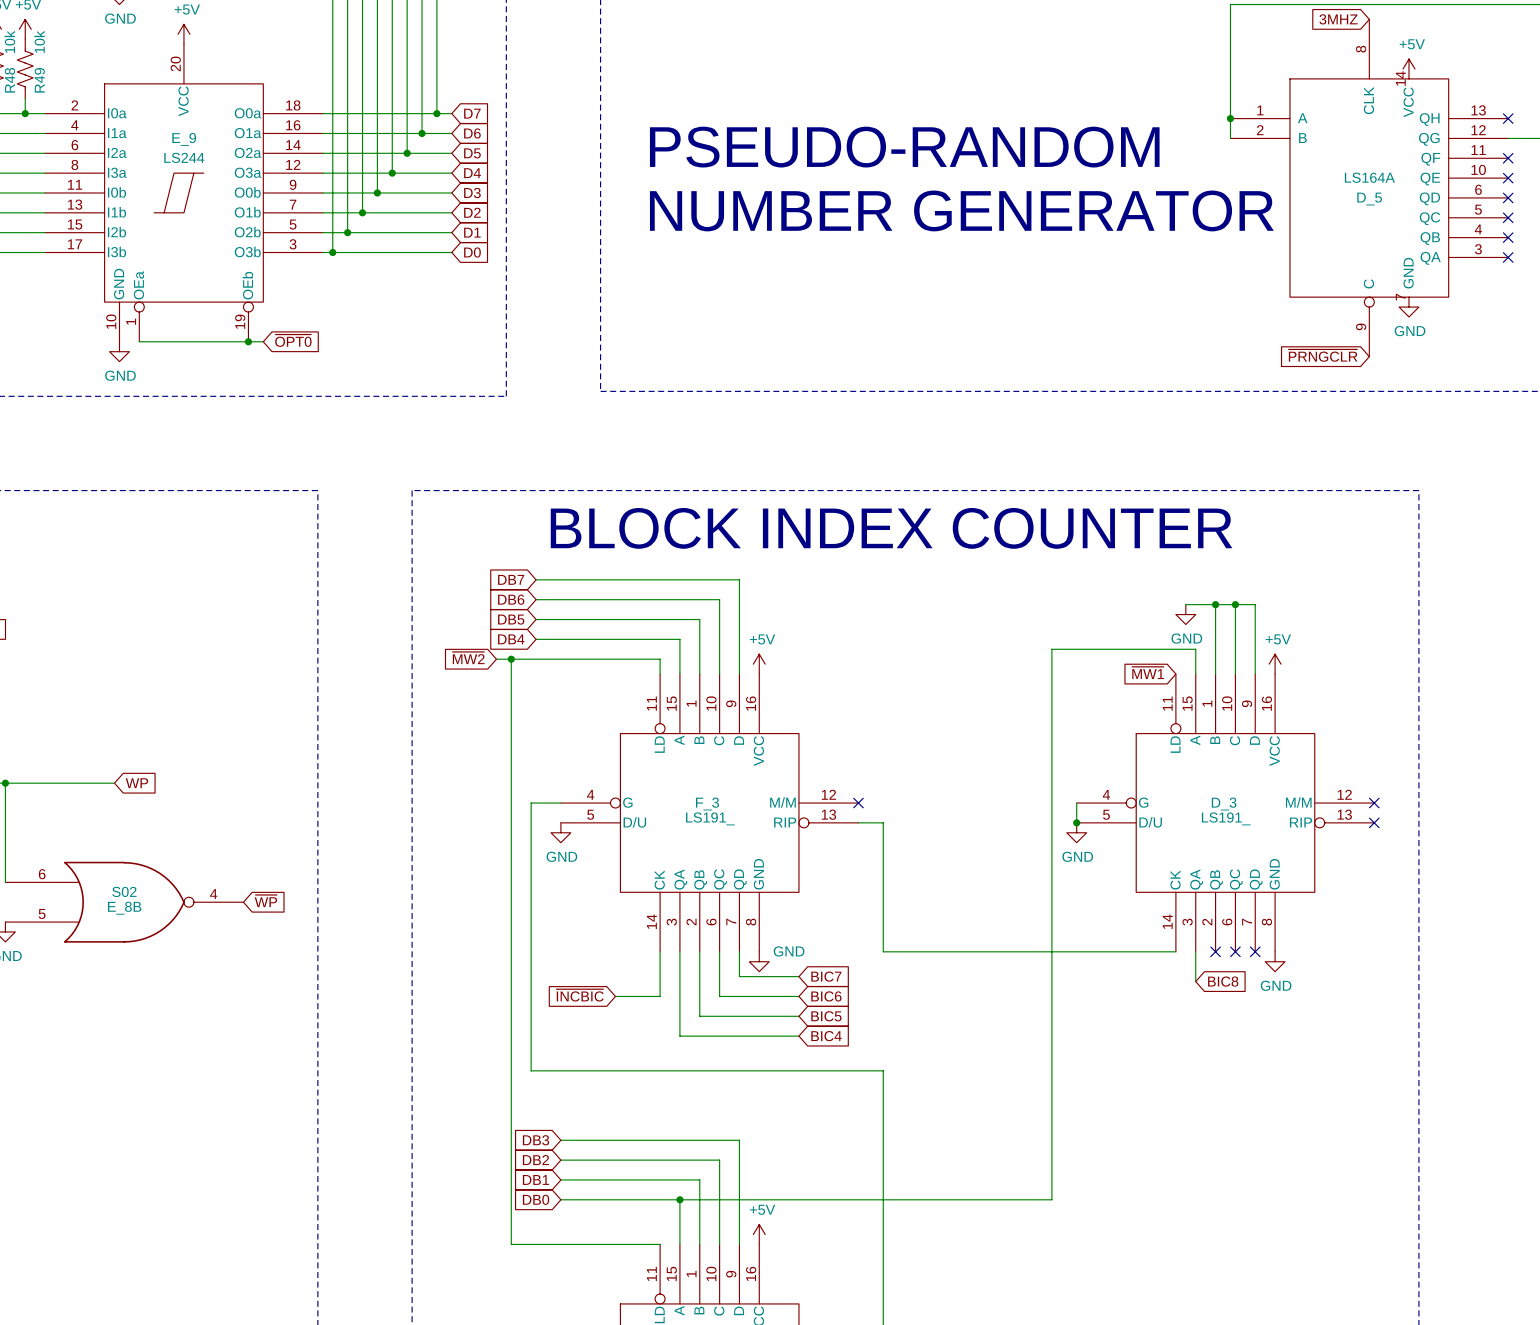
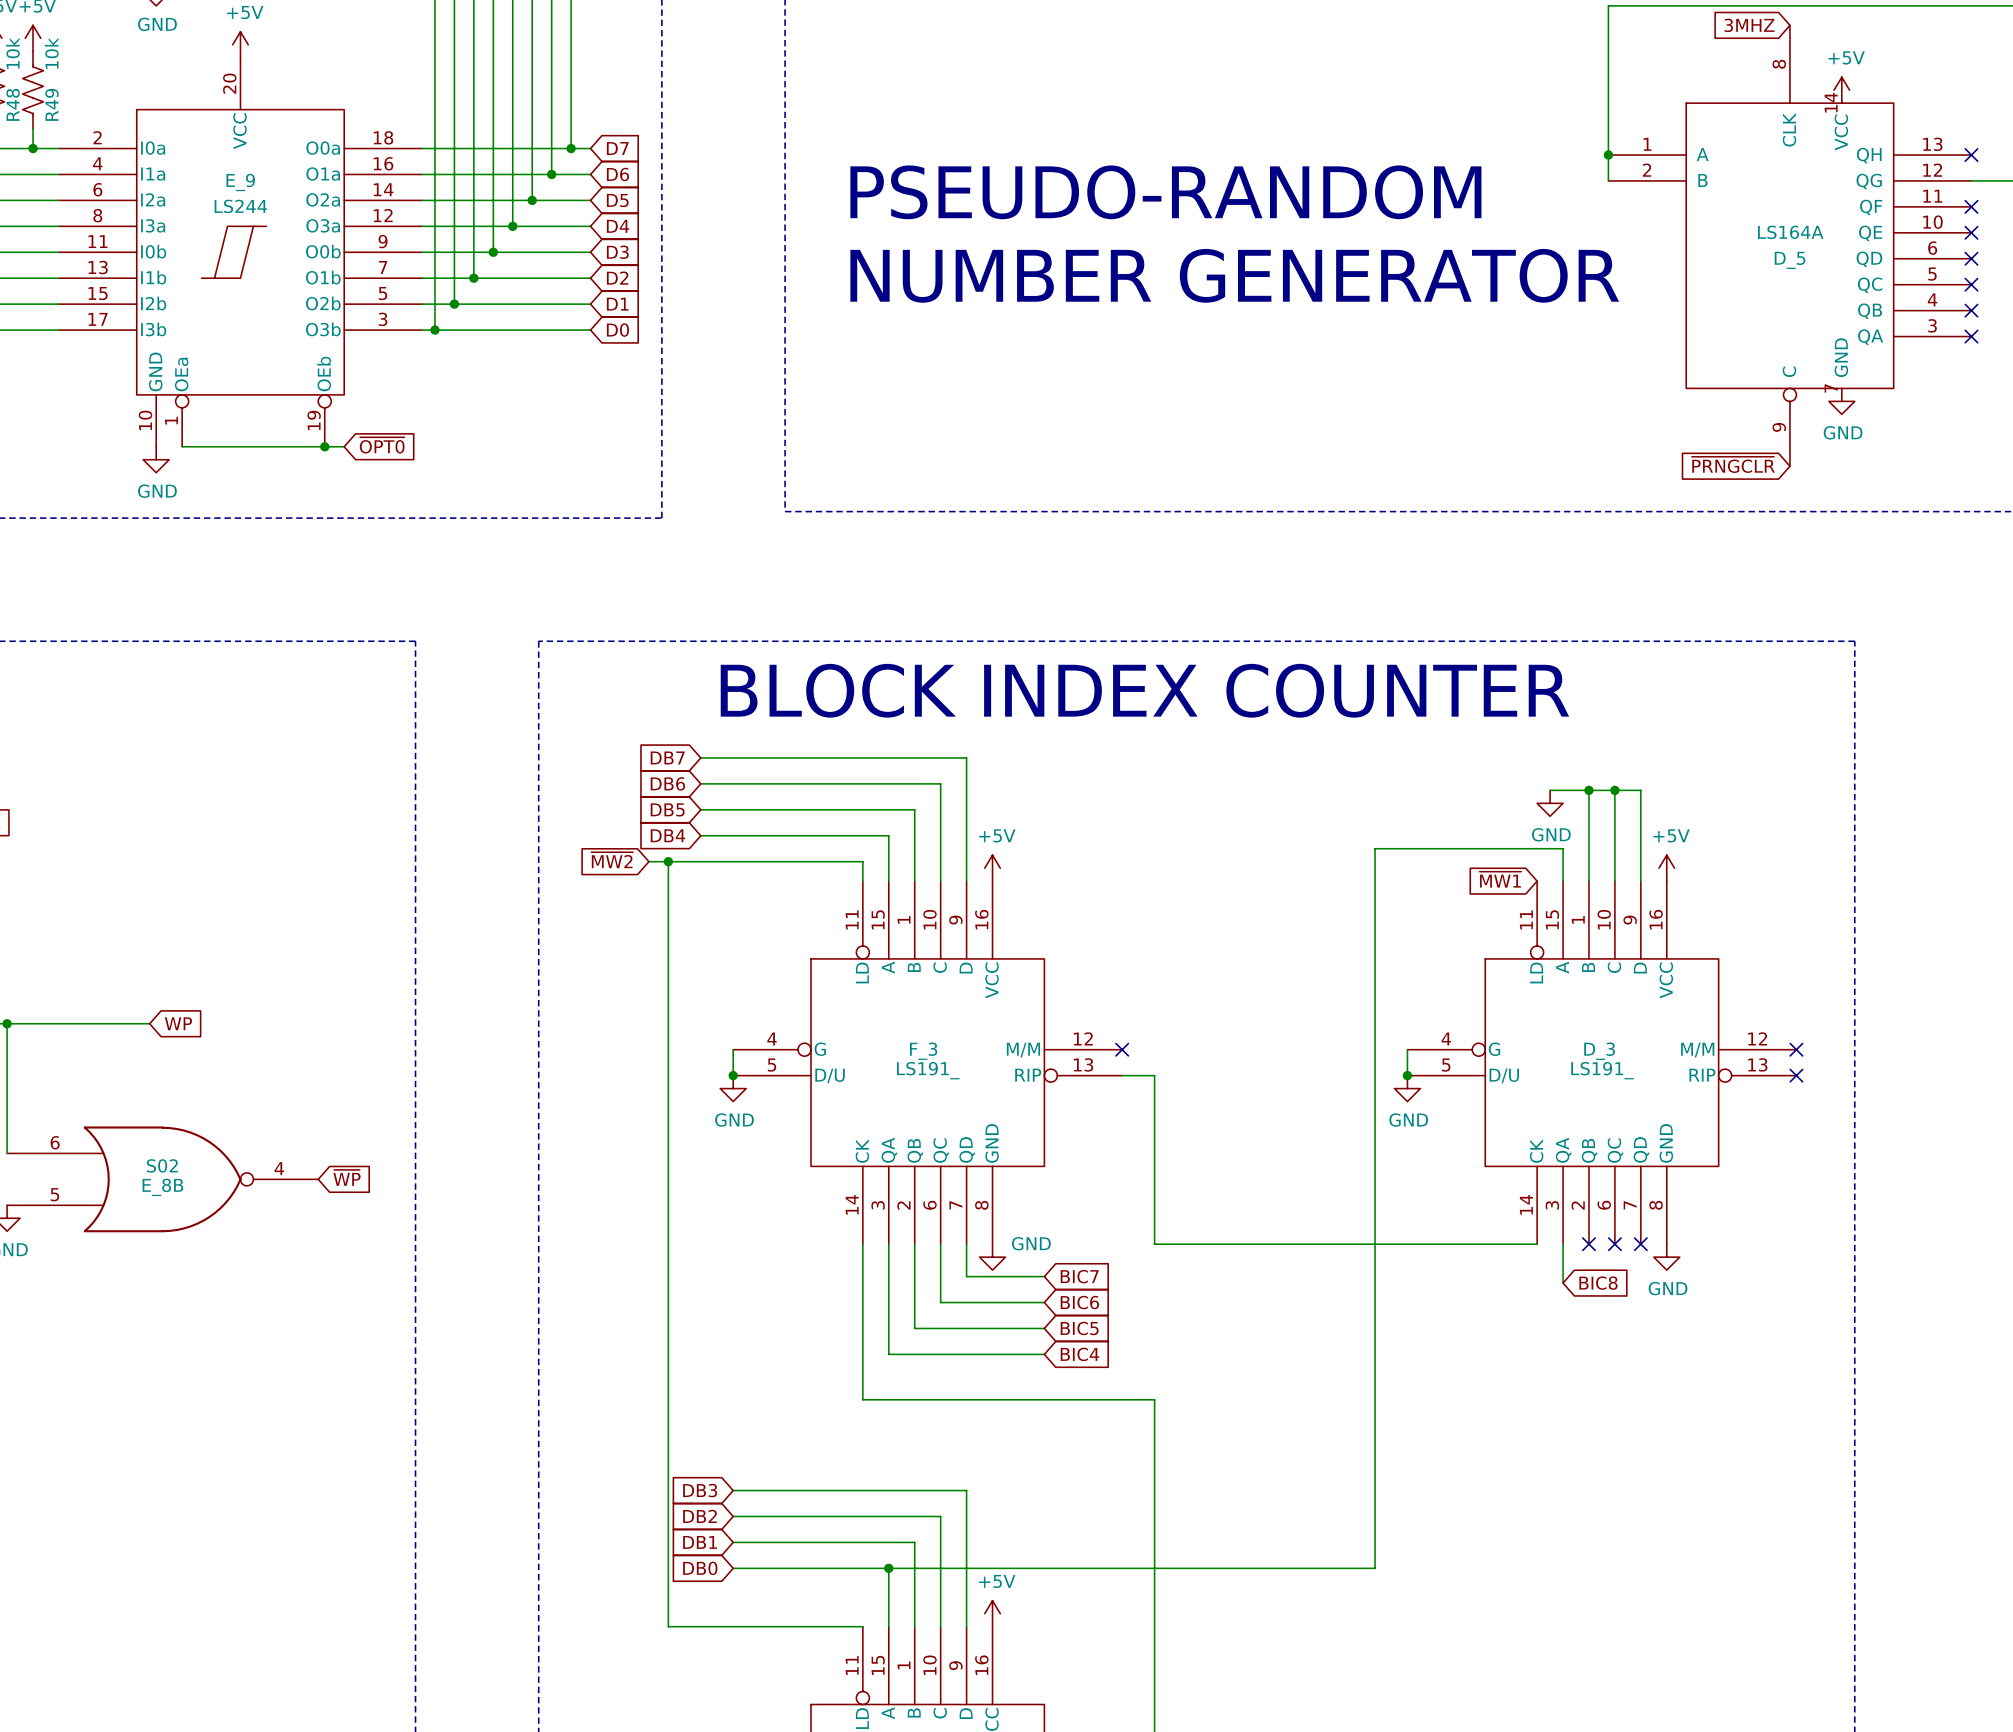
wire: (560, 803) (531, 803) (531, 1070) (660, 1070) -> (733, 1049) (733, 1075)
junction: none -> (733, 1075)
global label: ~{INCBIC} (580, 995) -> none
wire: (615, 996) (660, 996) -> (862, 1399) (862, 1302)

